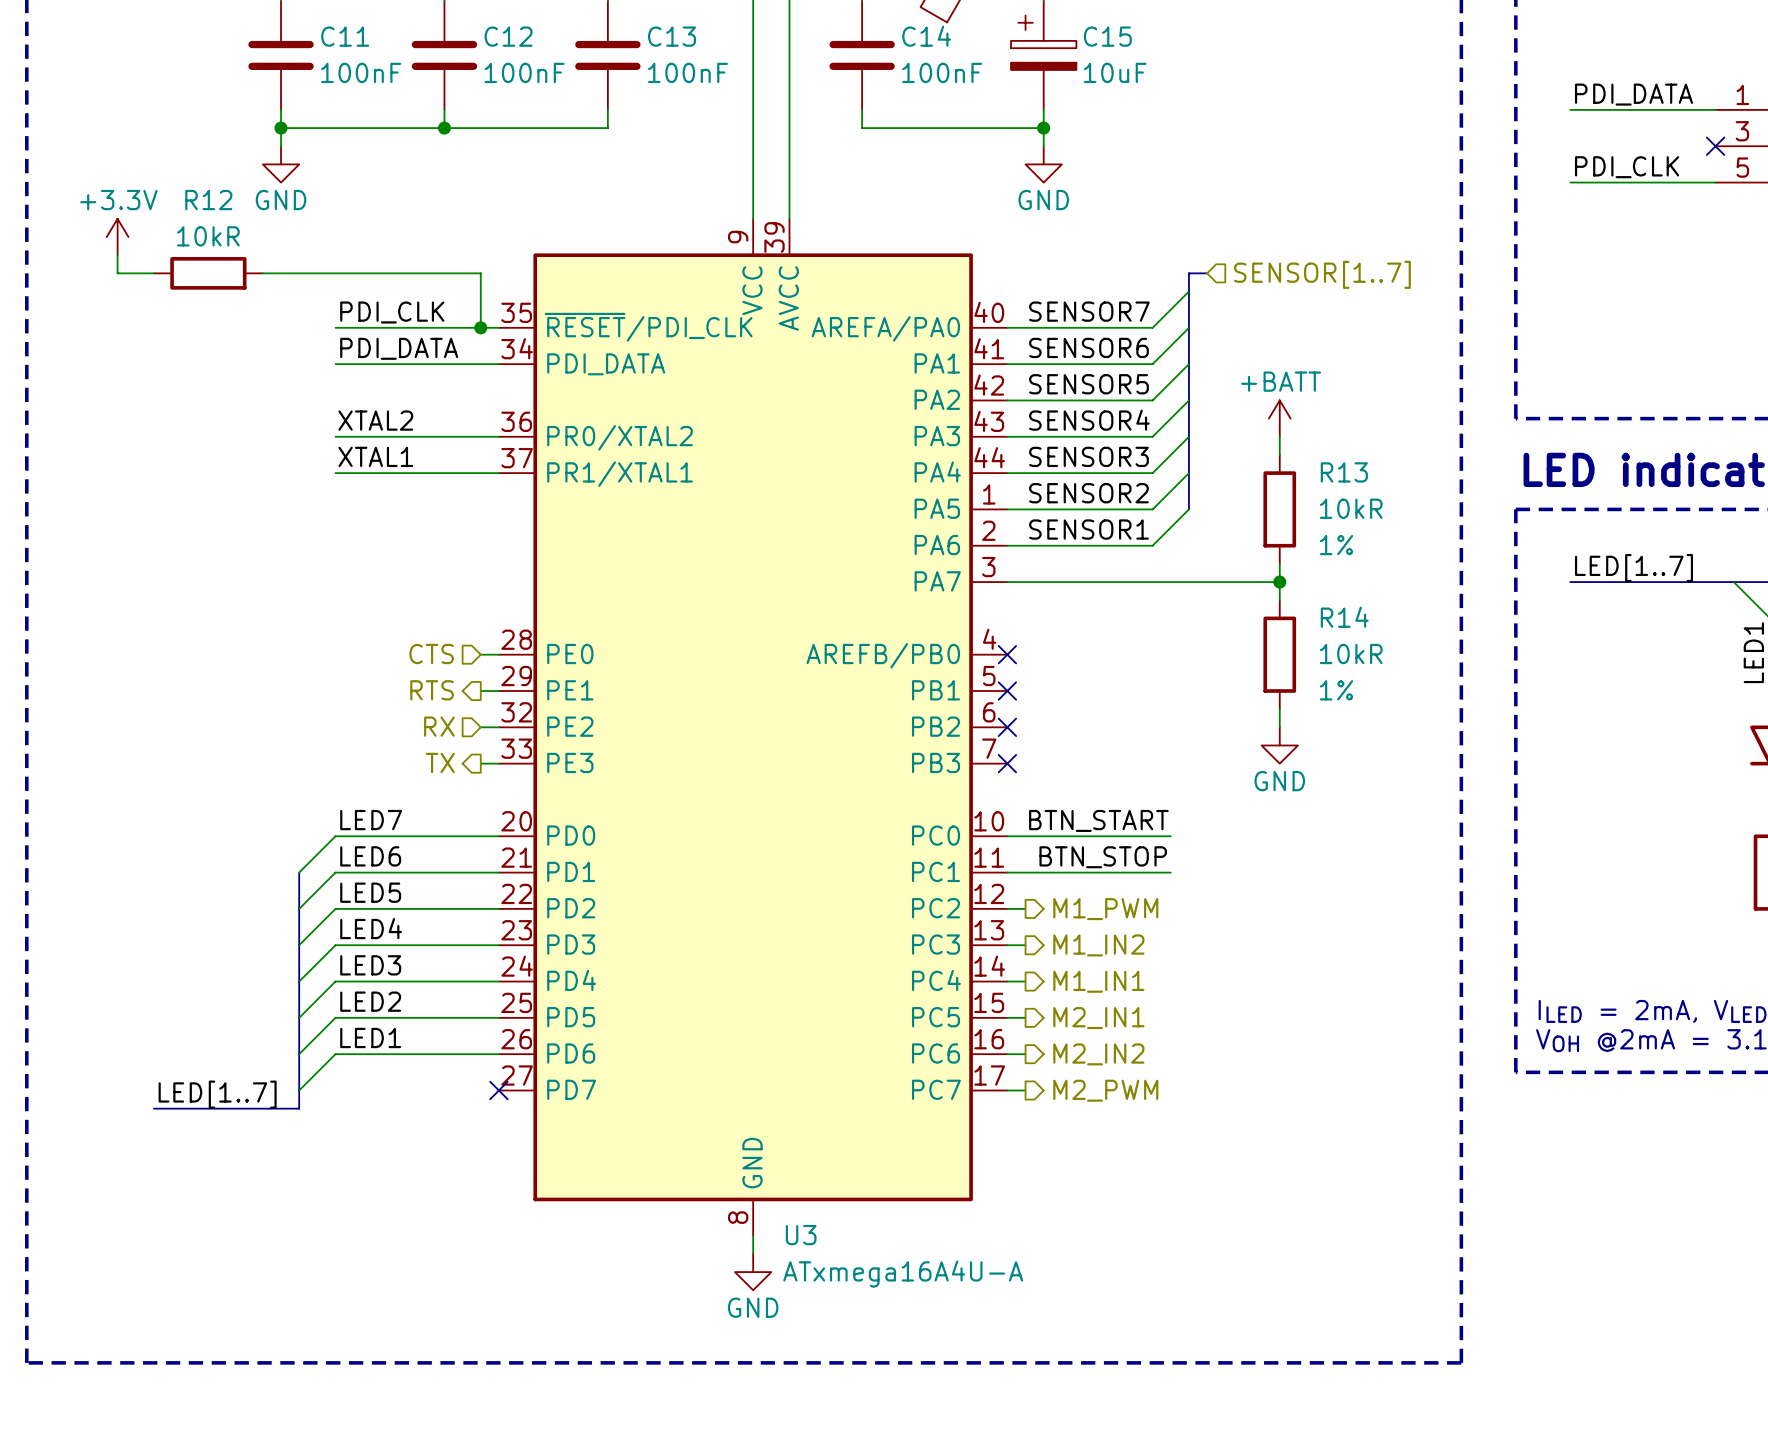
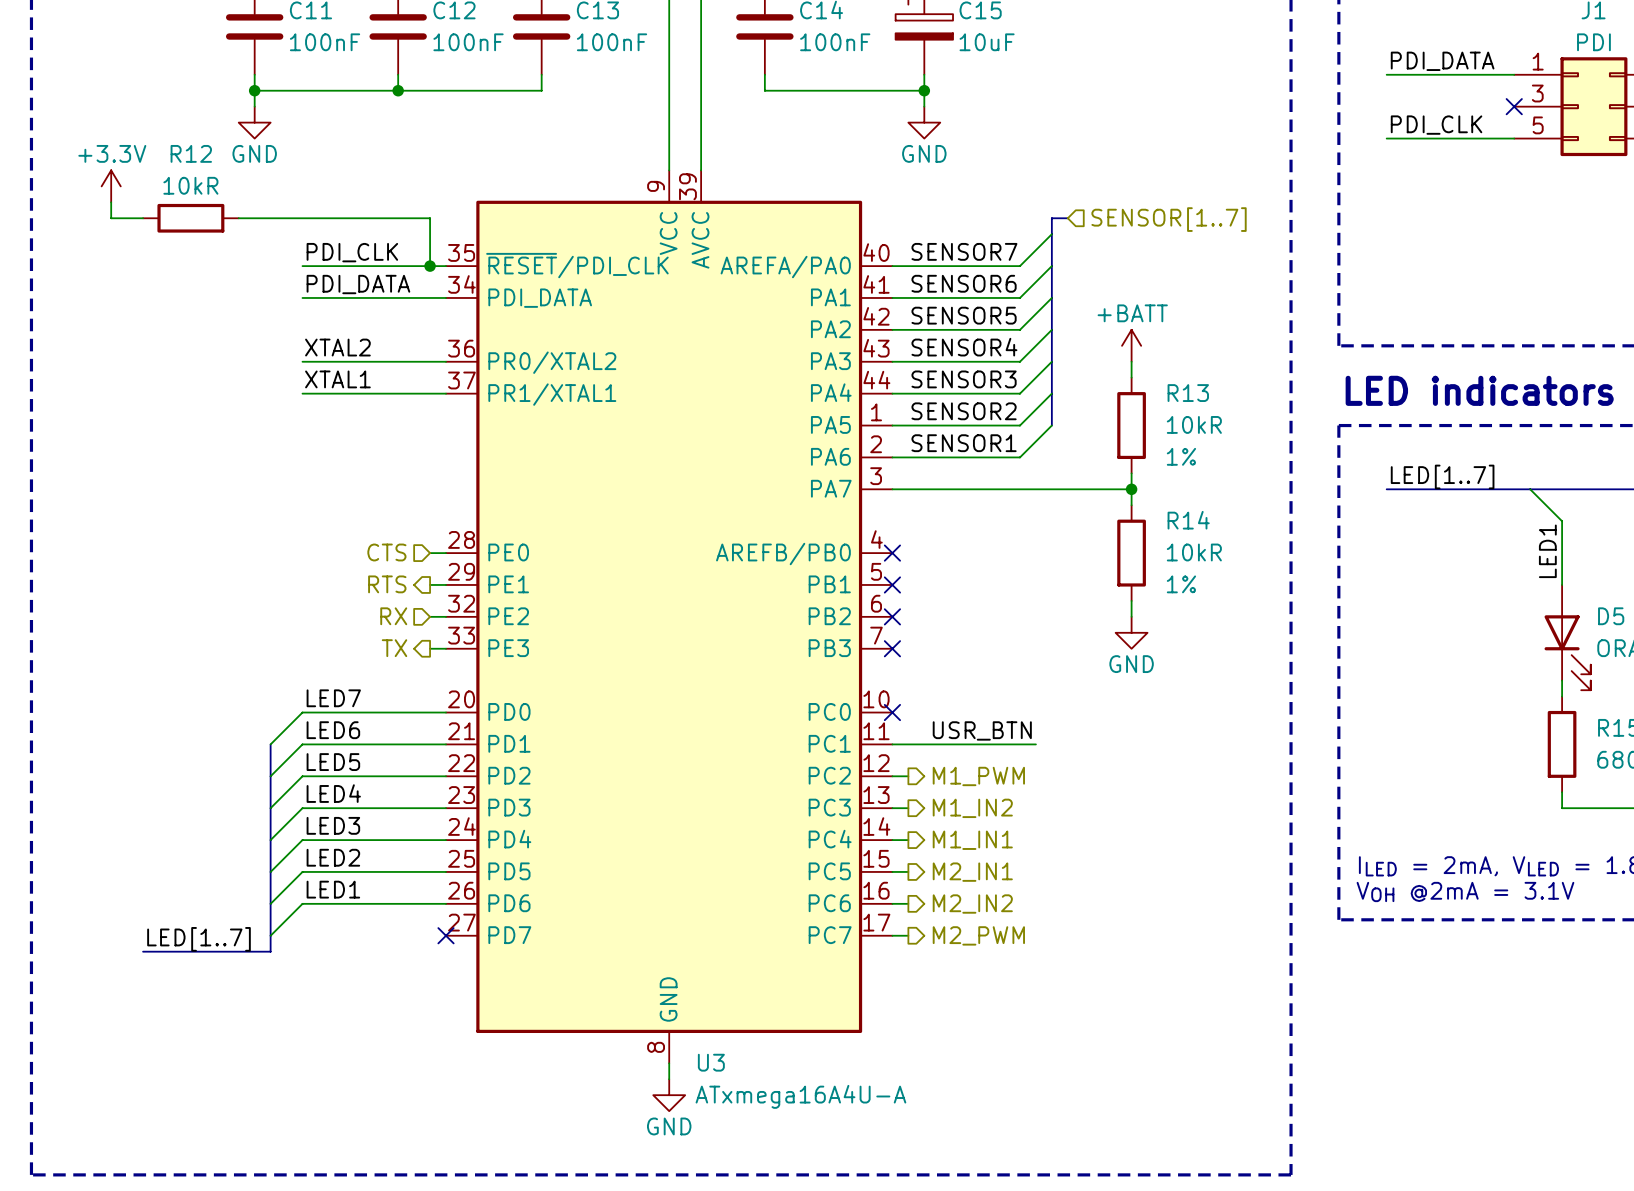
label: BTN_START (1098, 820) -> none
wire: (1007, 836) (1170, 836) -> none
no-connect mark: none -> (892, 712)
label: BTN_STOP (1103, 857) -> USR_BTN (982, 730)

